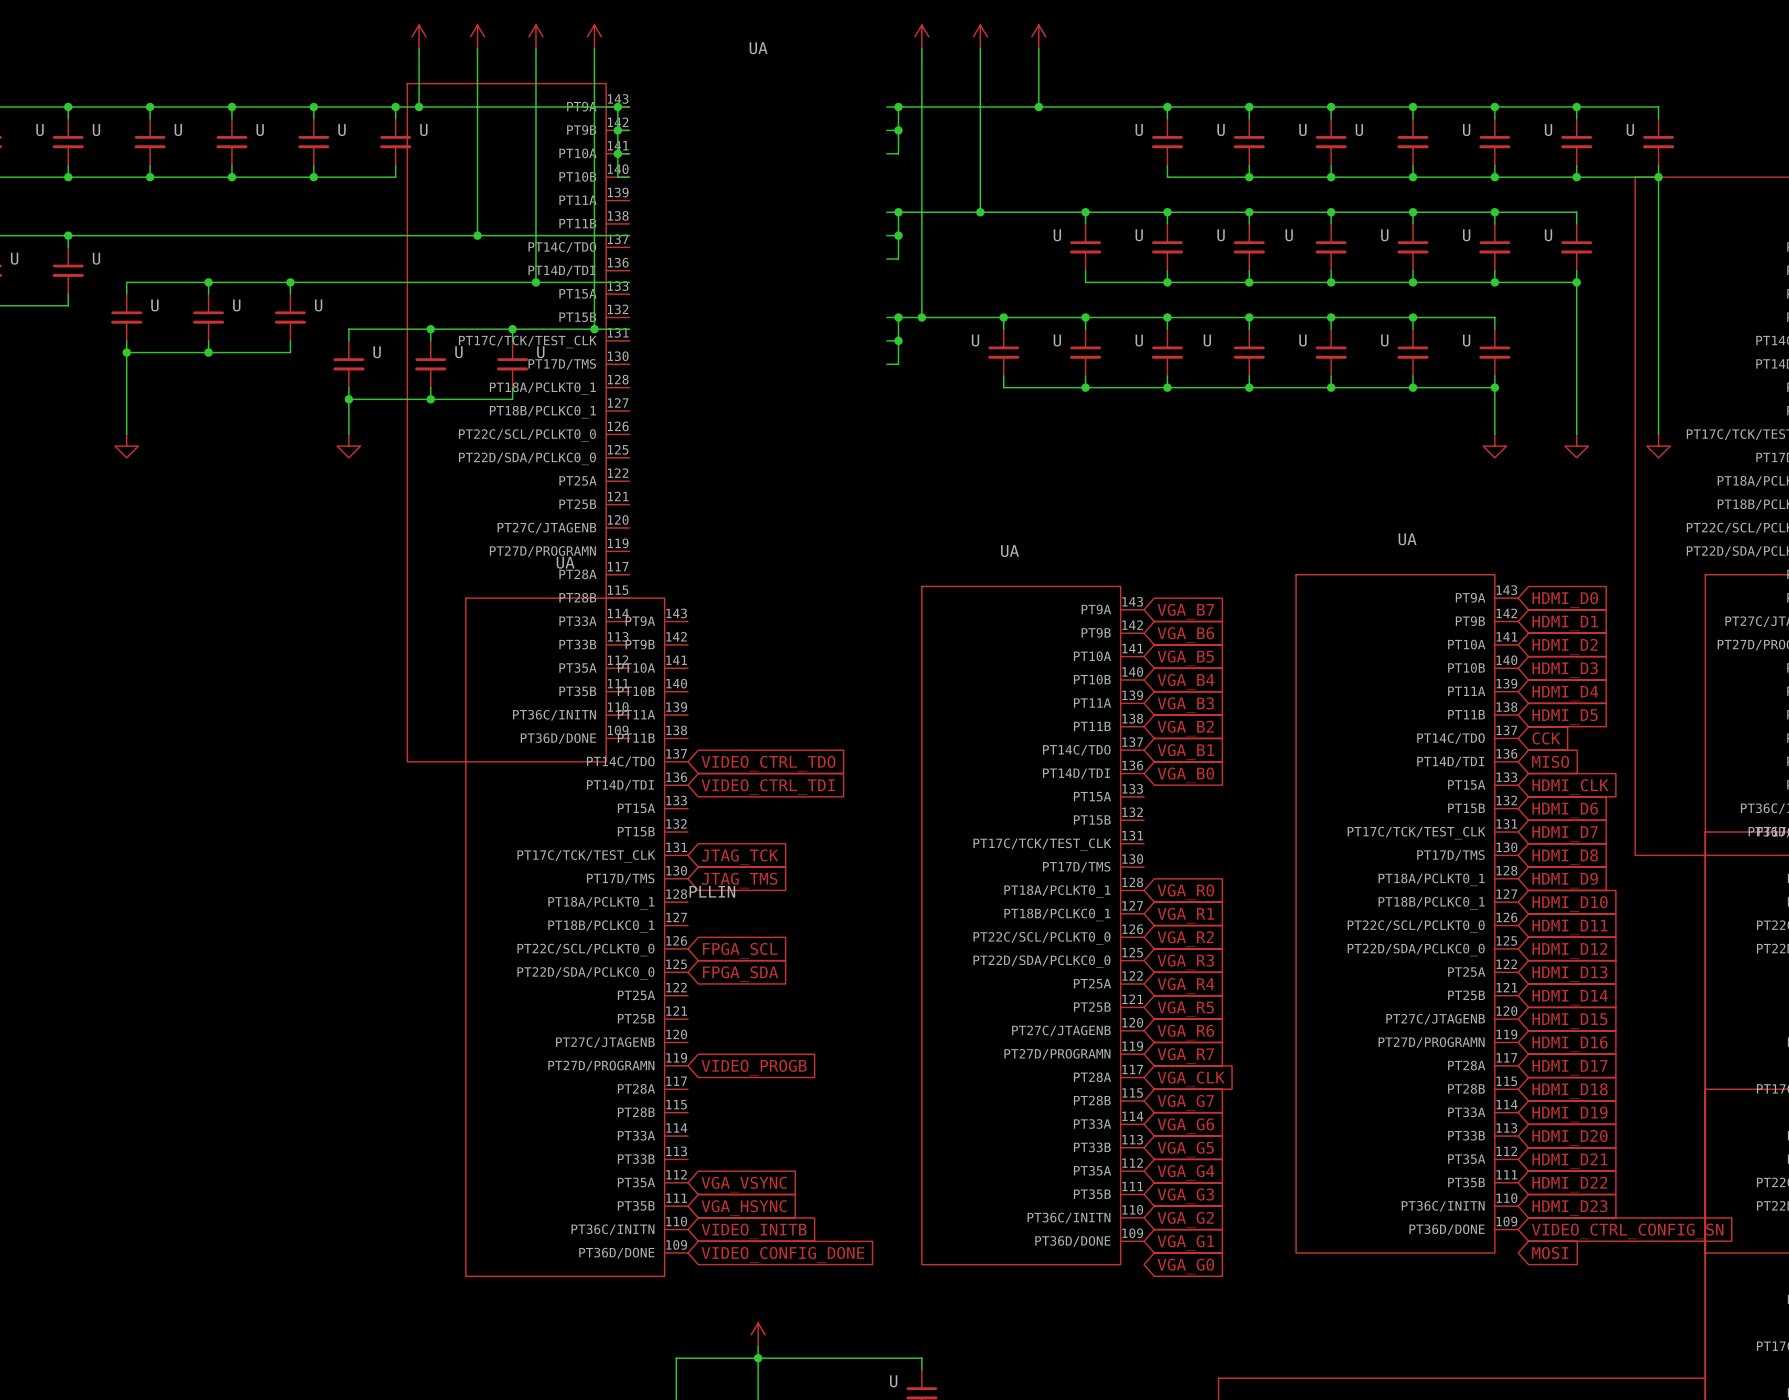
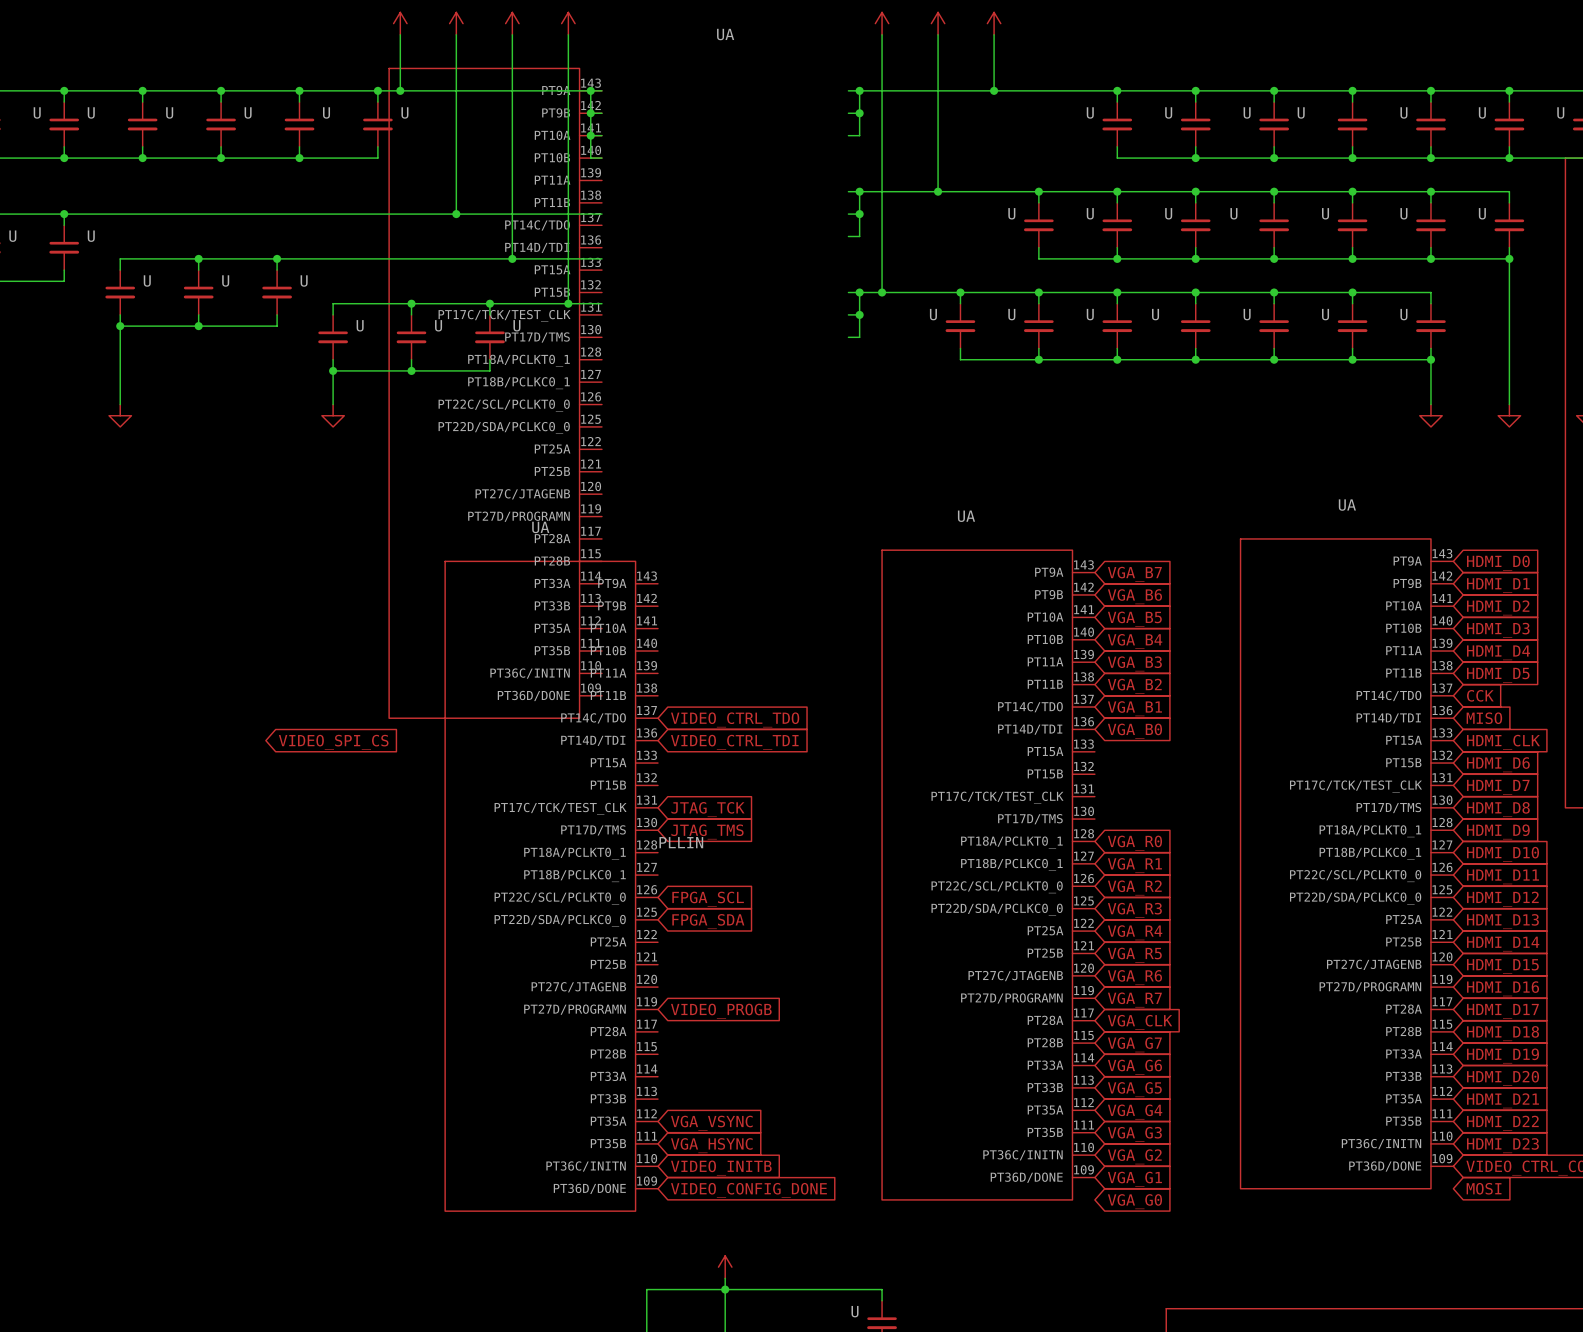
global label: none -> VIDEO_SPI_CS (333, 742)

